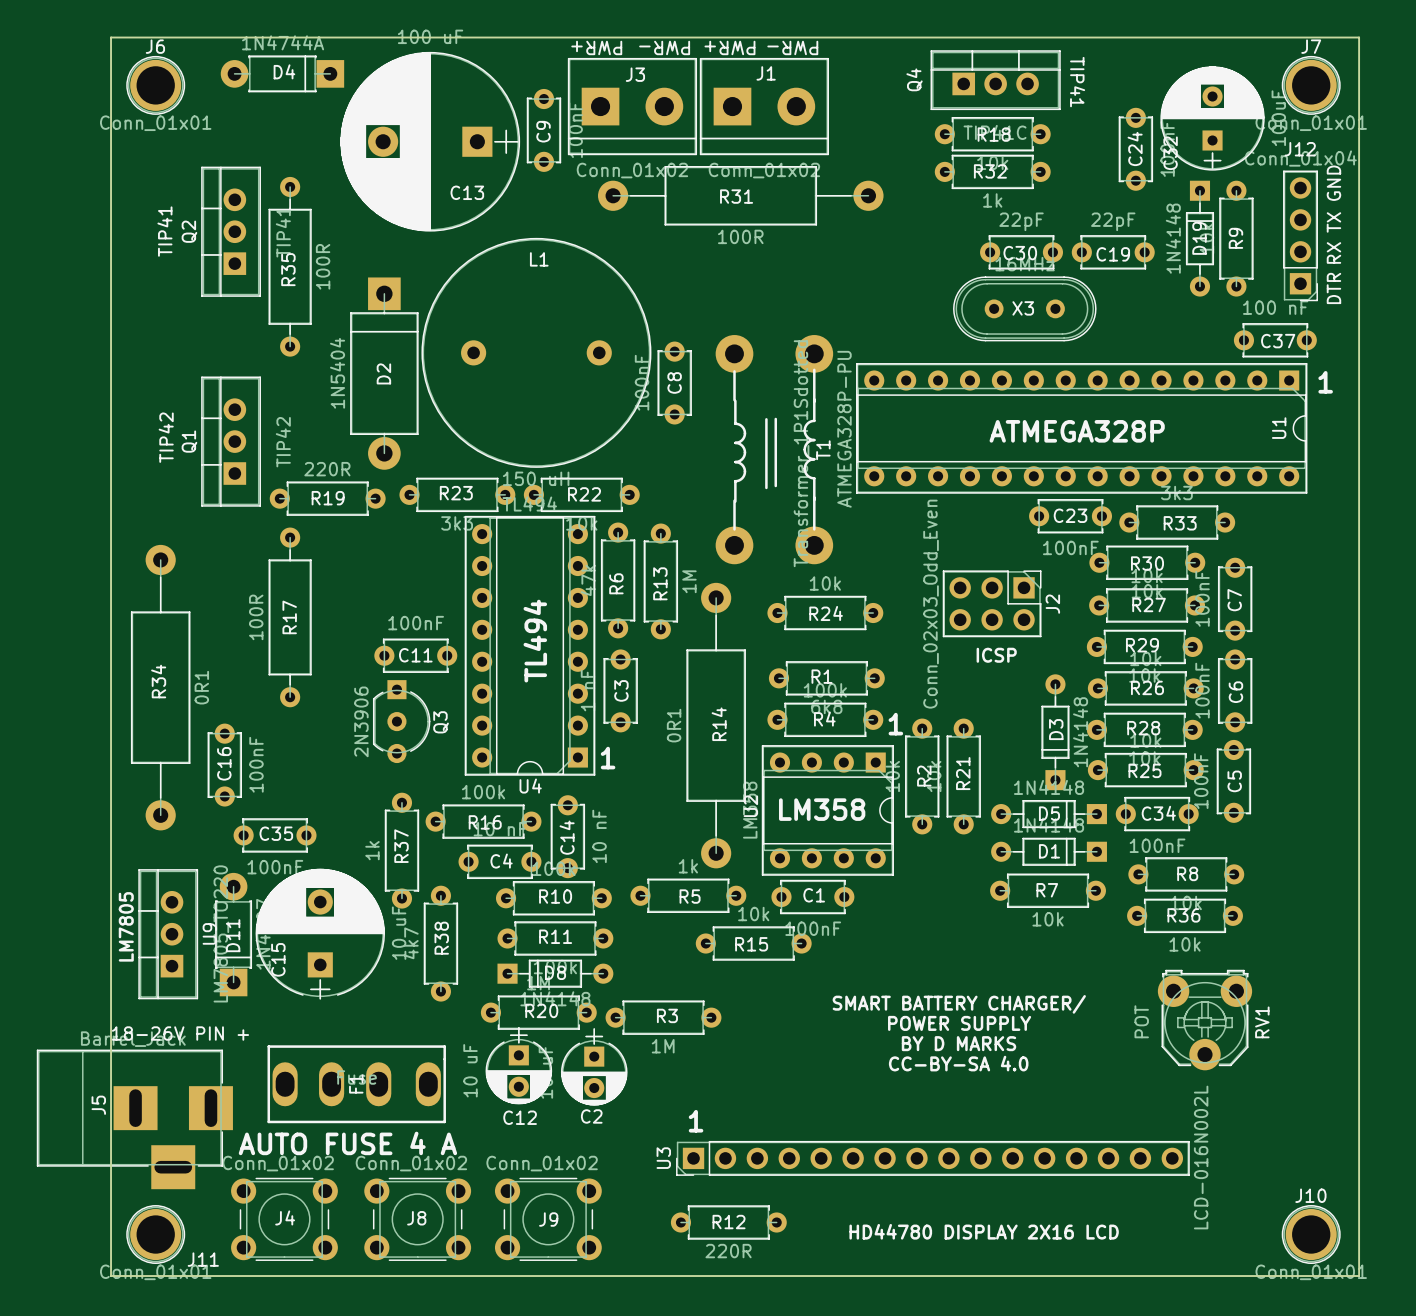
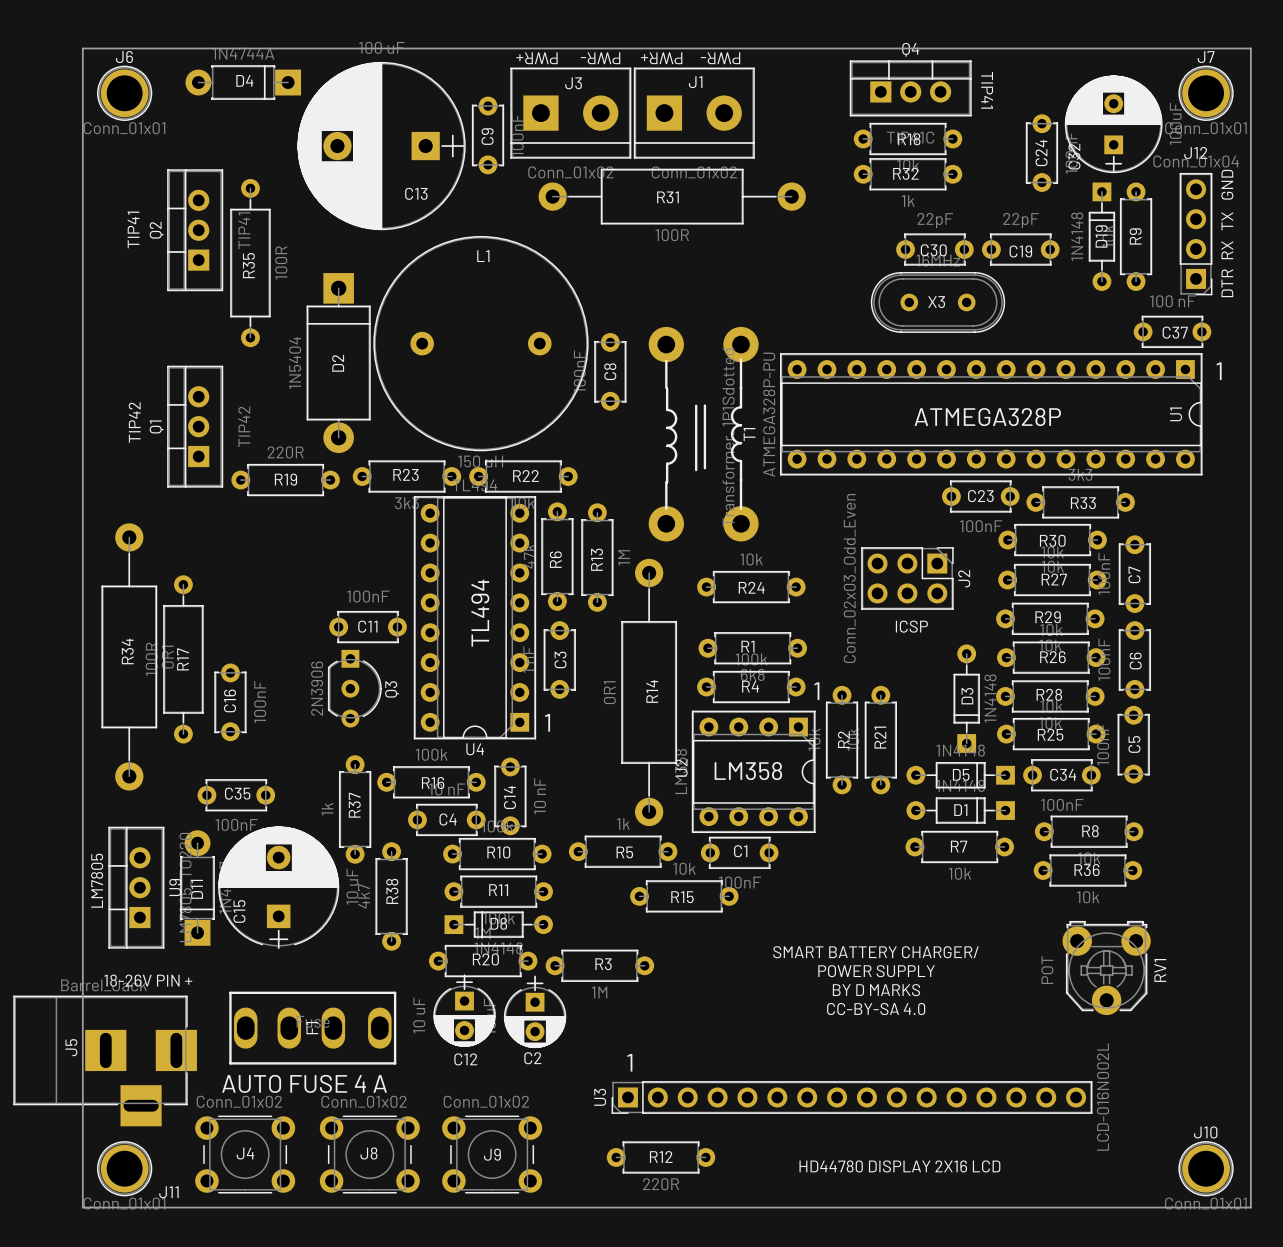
Q4 name rotation: 0° (914, 79) -> 90° clockwise (910, 49)
Q4 name position: Q4 (914, 79) -> Q4 (910, 49)
R17 position: (290, 617) -> (183, 659)
C16 position: (224, 765) -> (230, 702)

